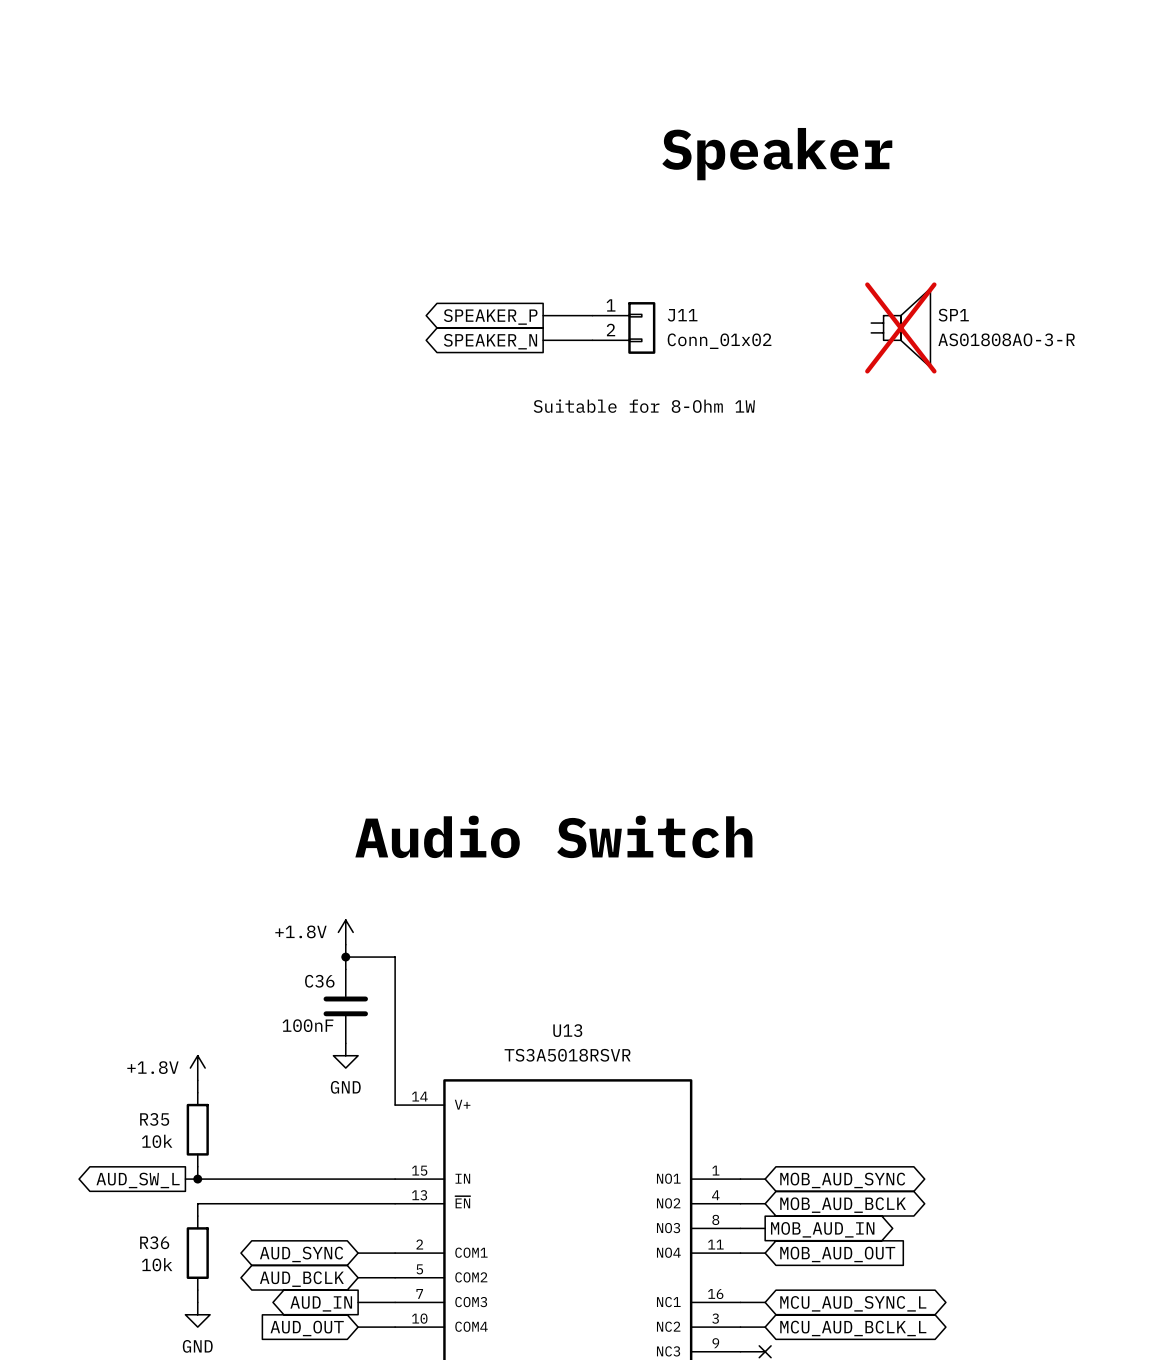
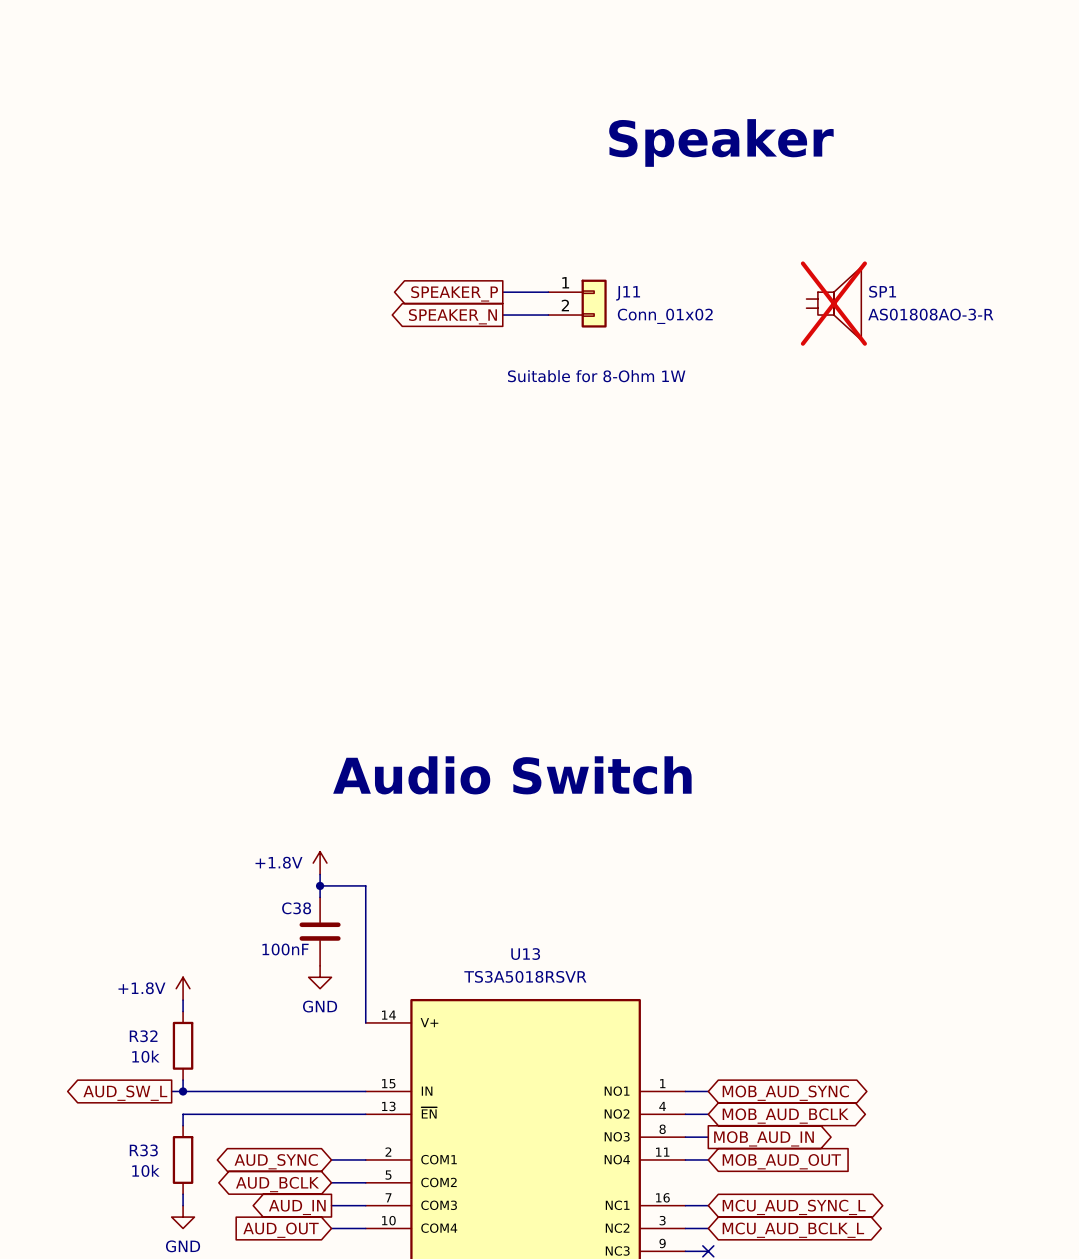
C36 name: C36 (319, 981) -> C38 (296, 908)
R35 name: R35 (154, 1119) -> R32 (143, 1036)
R36 name: R36 (154, 1242) -> R33 (143, 1150)

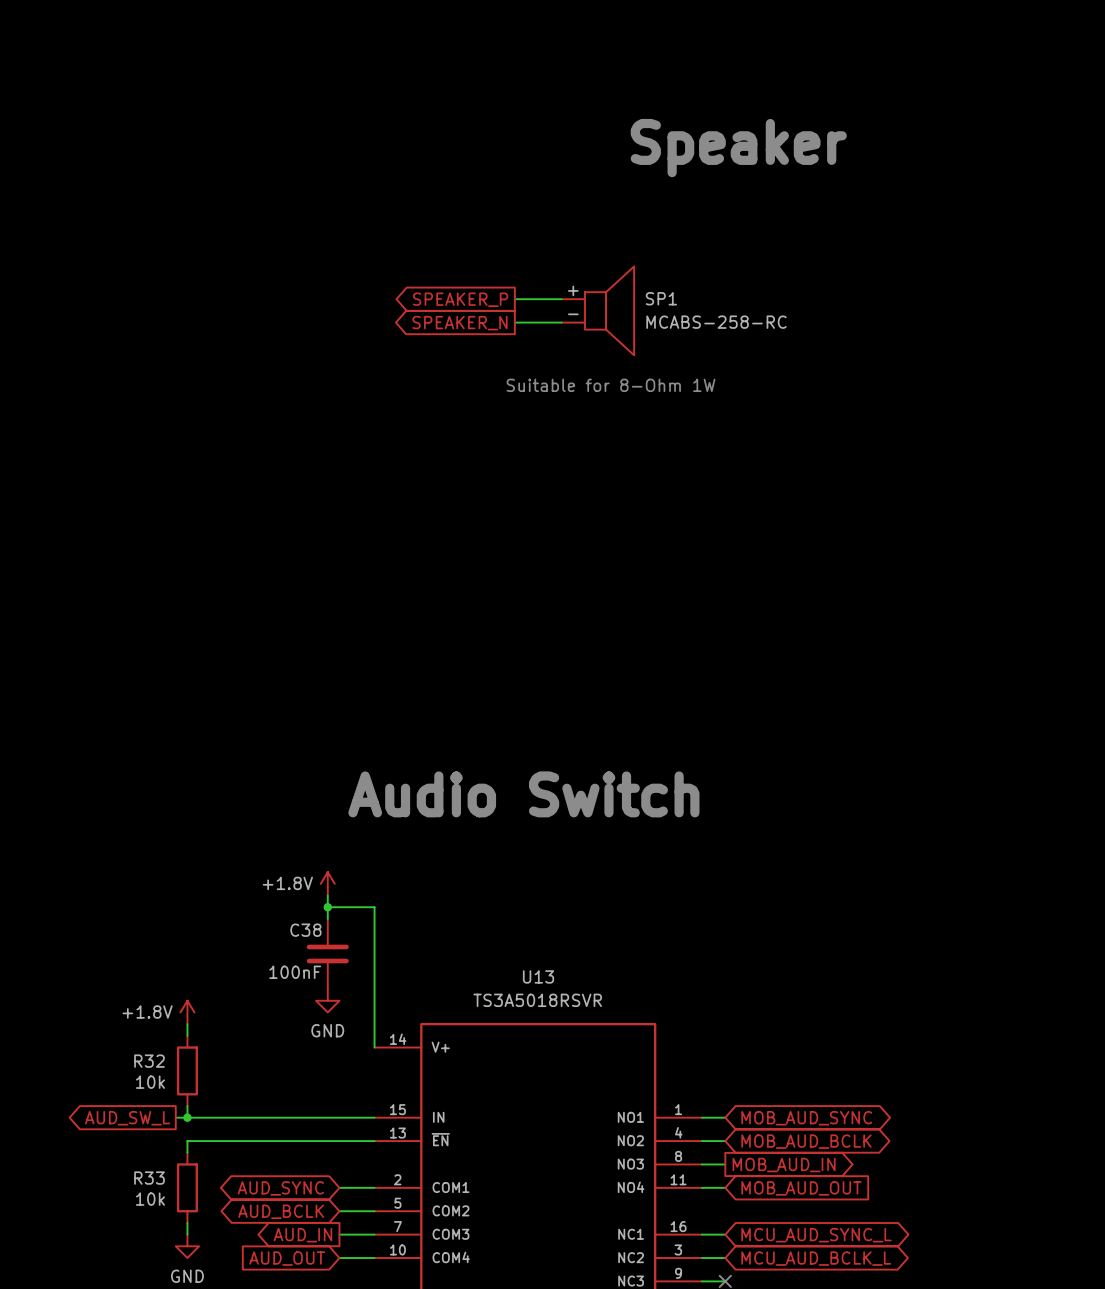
SP1 symbol: [806, 267, 862, 341] -> [561, 266, 635, 356]
J11: Conn_01x02 (577, 303) -> none
SP1 do-not-place cross: (833, 303) -> none
SP1 value: AS01808AO-3-R (930, 314) -> MCABS-258-RC (716, 322)

